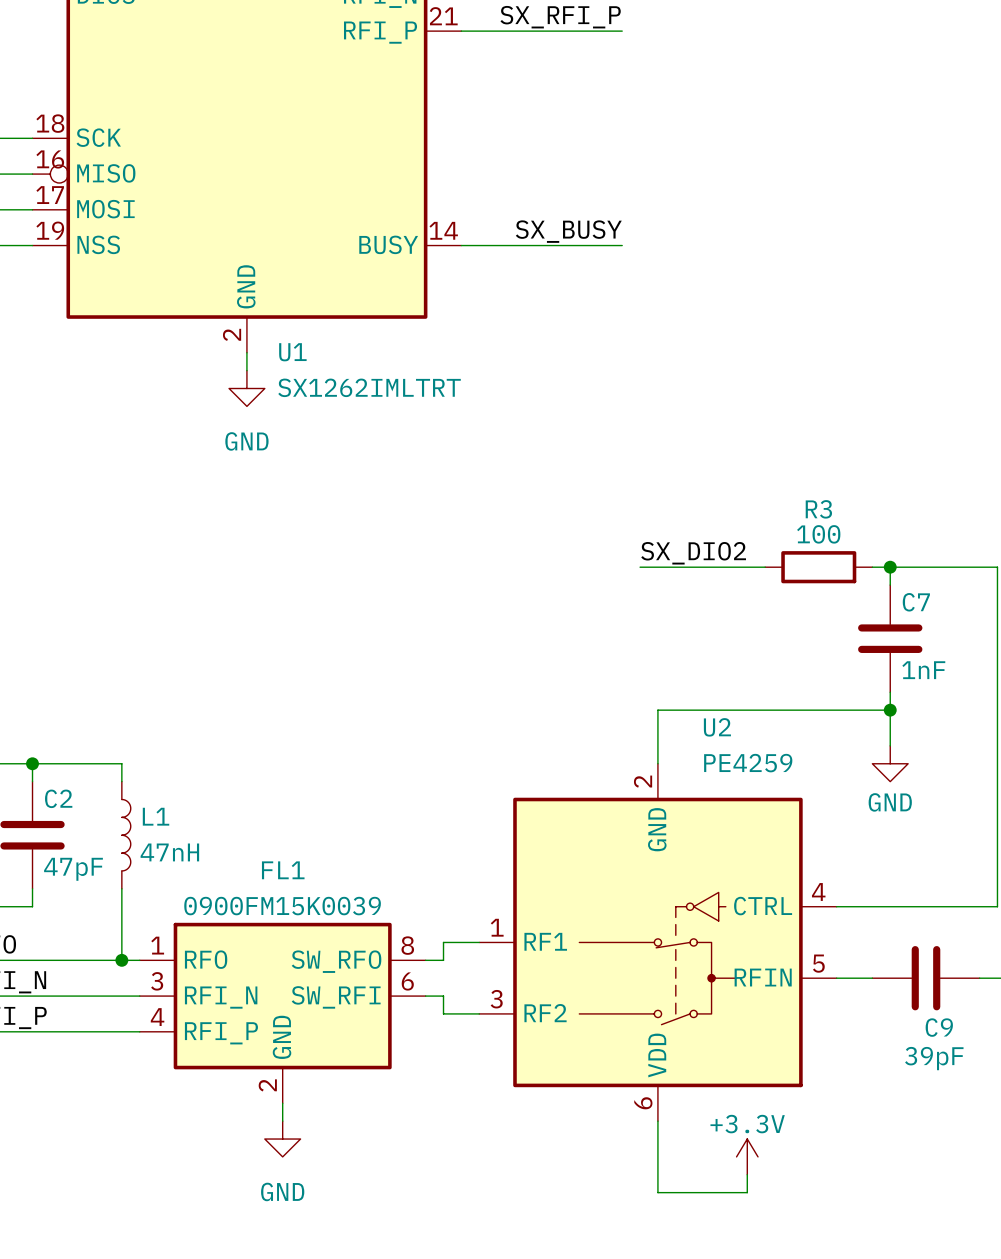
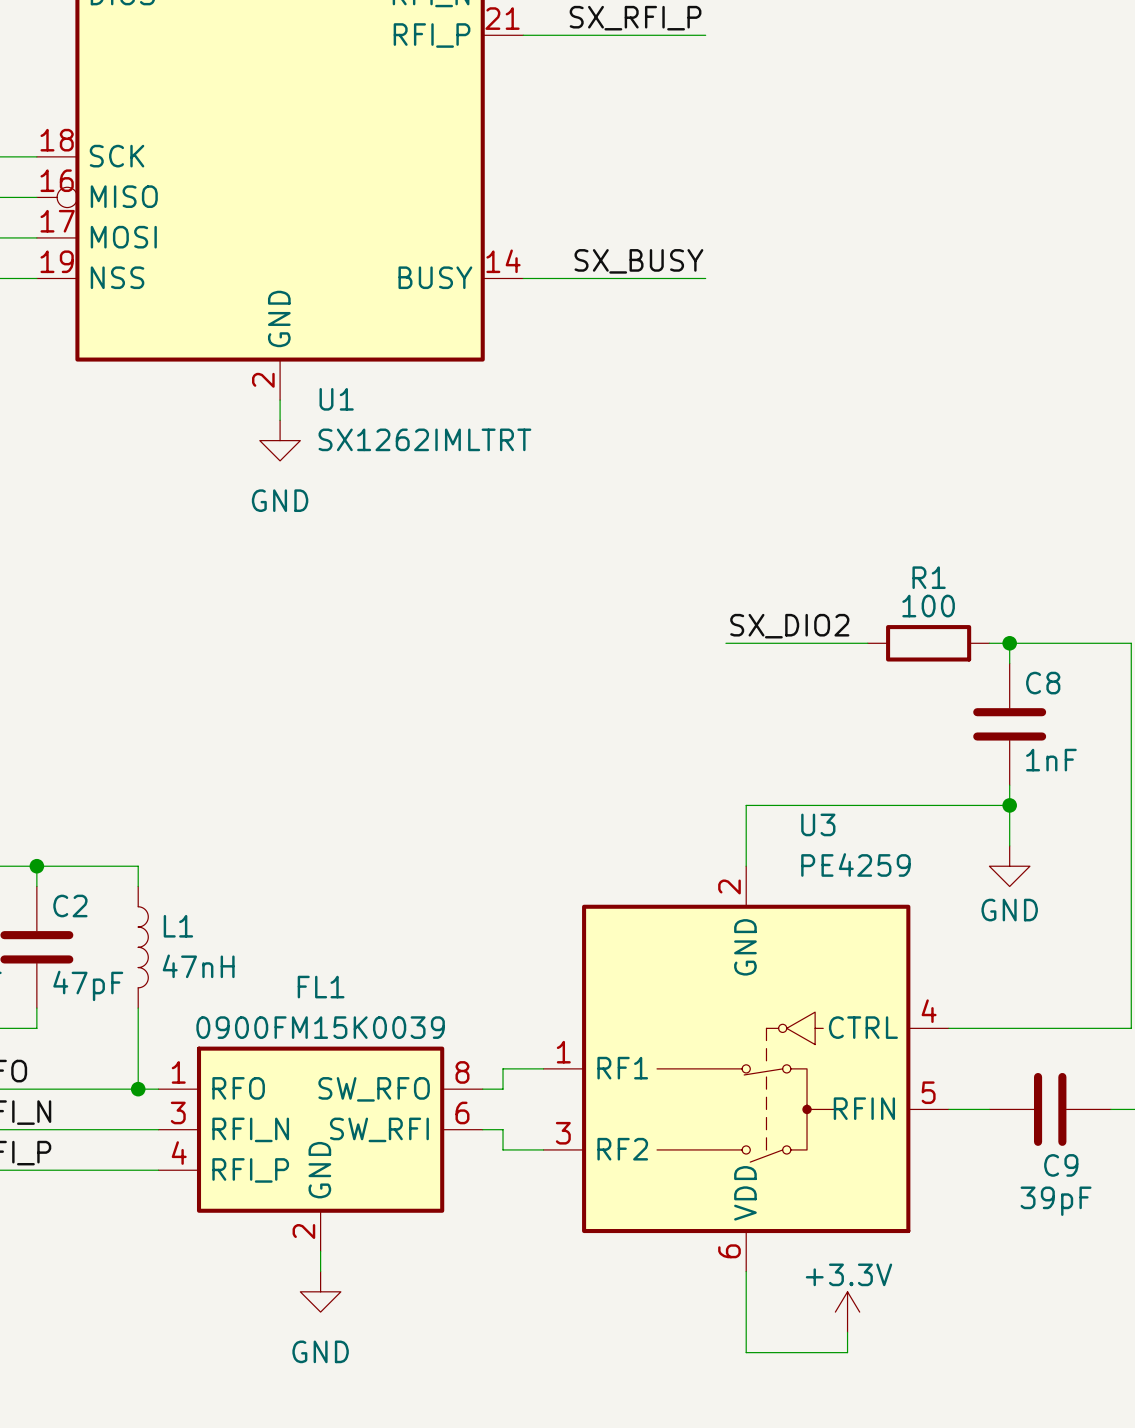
R3 name: R3 (818, 509) -> R1 (929, 577)
C7 name: C7 (916, 602) -> C8 (1043, 683)
U2 name: U2 (717, 727) -> U3 (818, 824)

